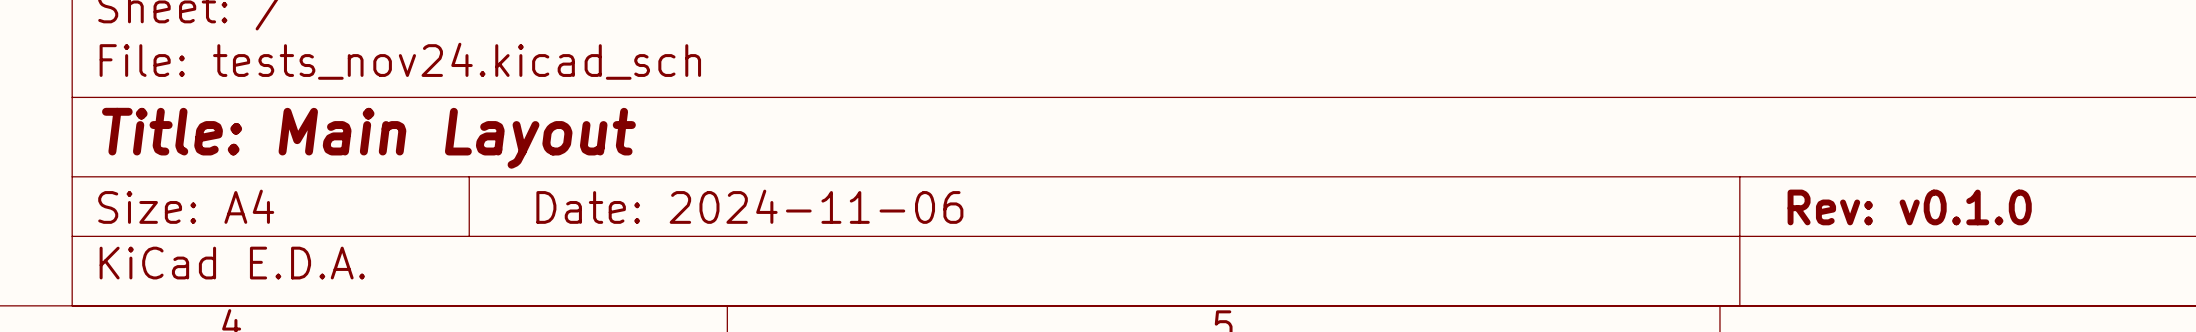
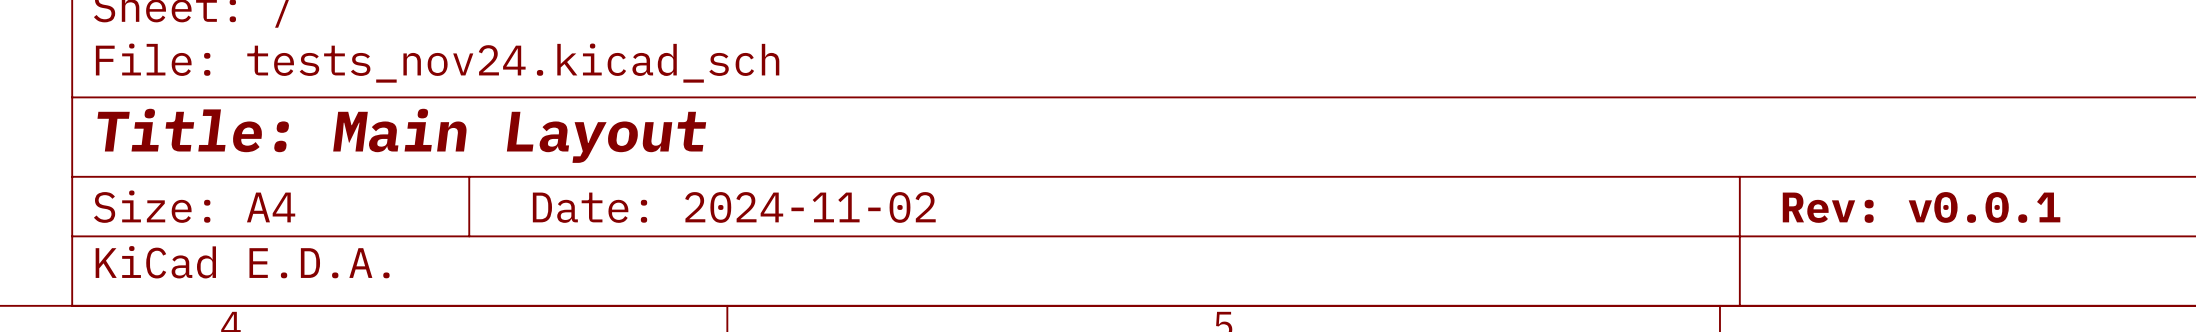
title block: Date: 2024-11-06 (749, 206) -> Date: 2024-11-02 (734, 207)
title block: Rev: v0.1.0 (1909, 207) -> Rev: v0.0.1 (1921, 207)

